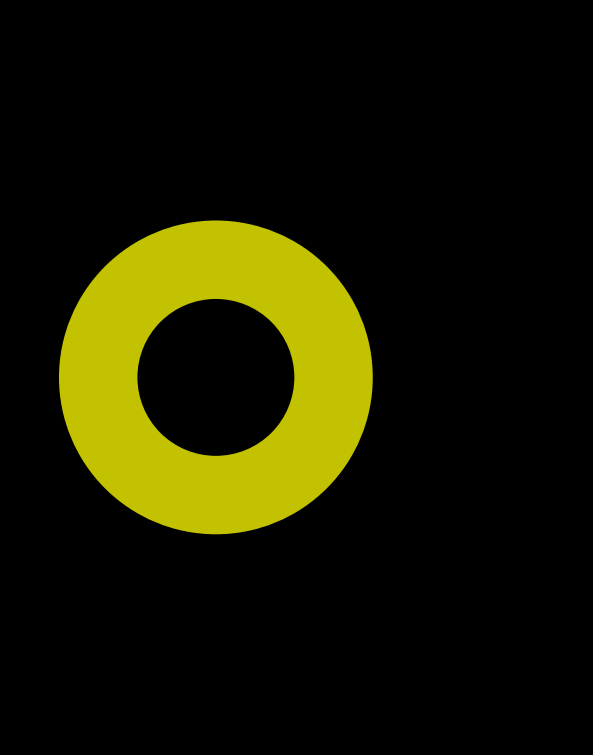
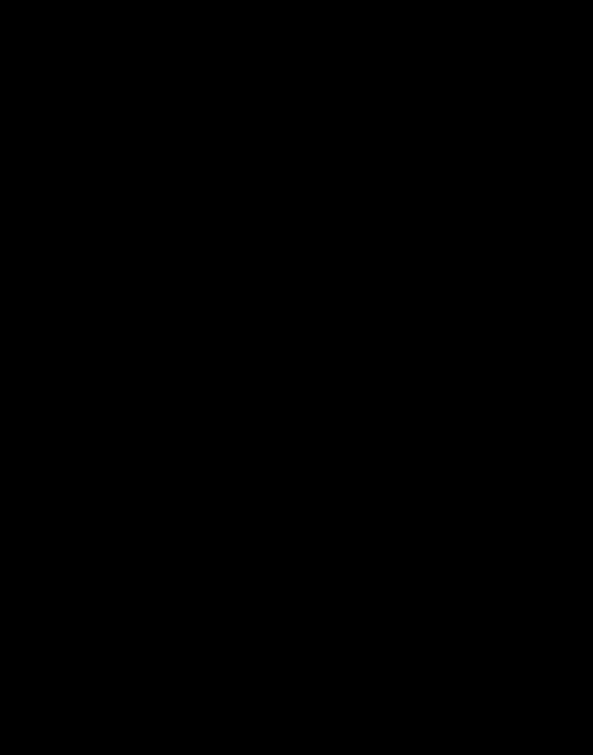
part: (215, 377) -> none

